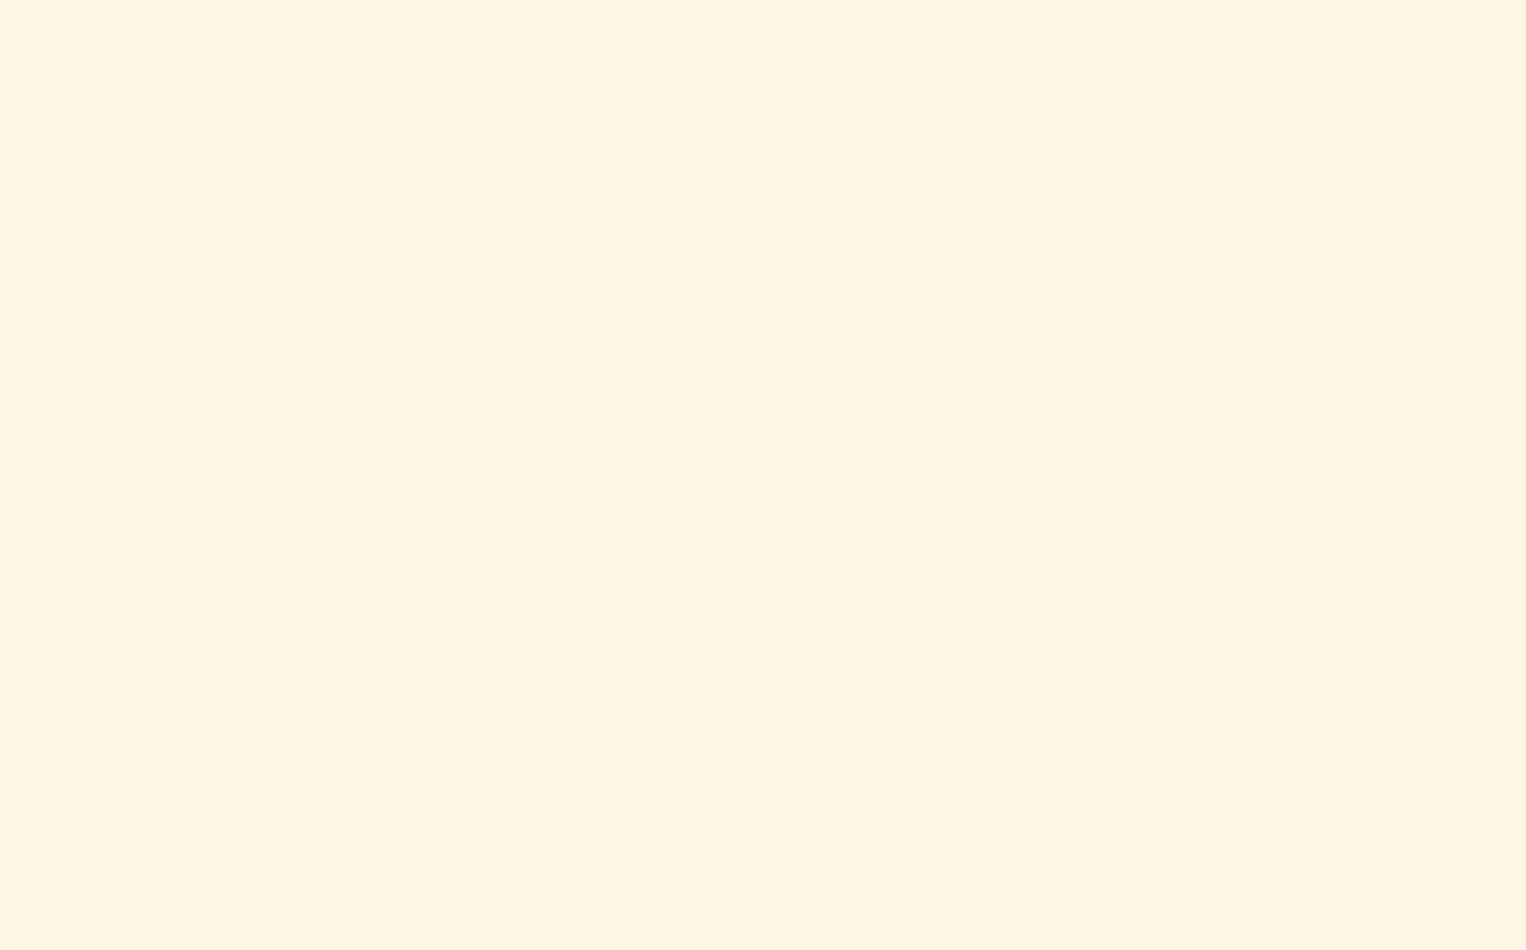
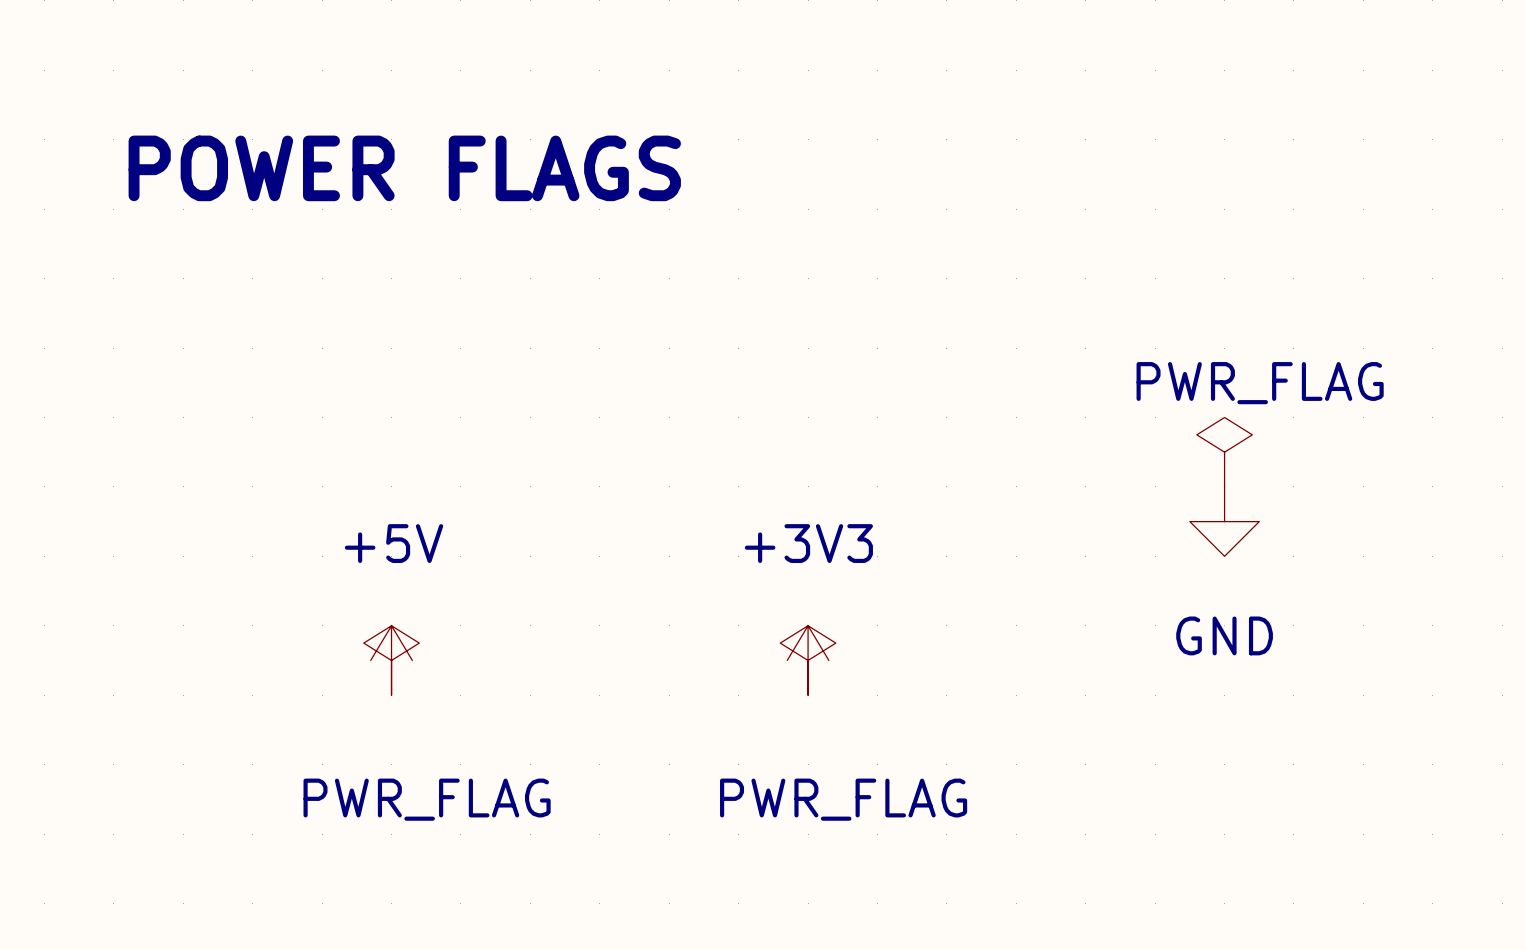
text: none -> POWER FLAGS (404, 168)
power symbol: none -> PWR_FLAG (1224, 452)
power symbol: none -> GND (1224, 521)
power symbol: none -> +5V (391, 660)
power symbol: none -> PWR_FLAG (391, 660)
power symbol: none -> +3V3 (808, 660)
power symbol: none -> PWR_FLAG (808, 660)

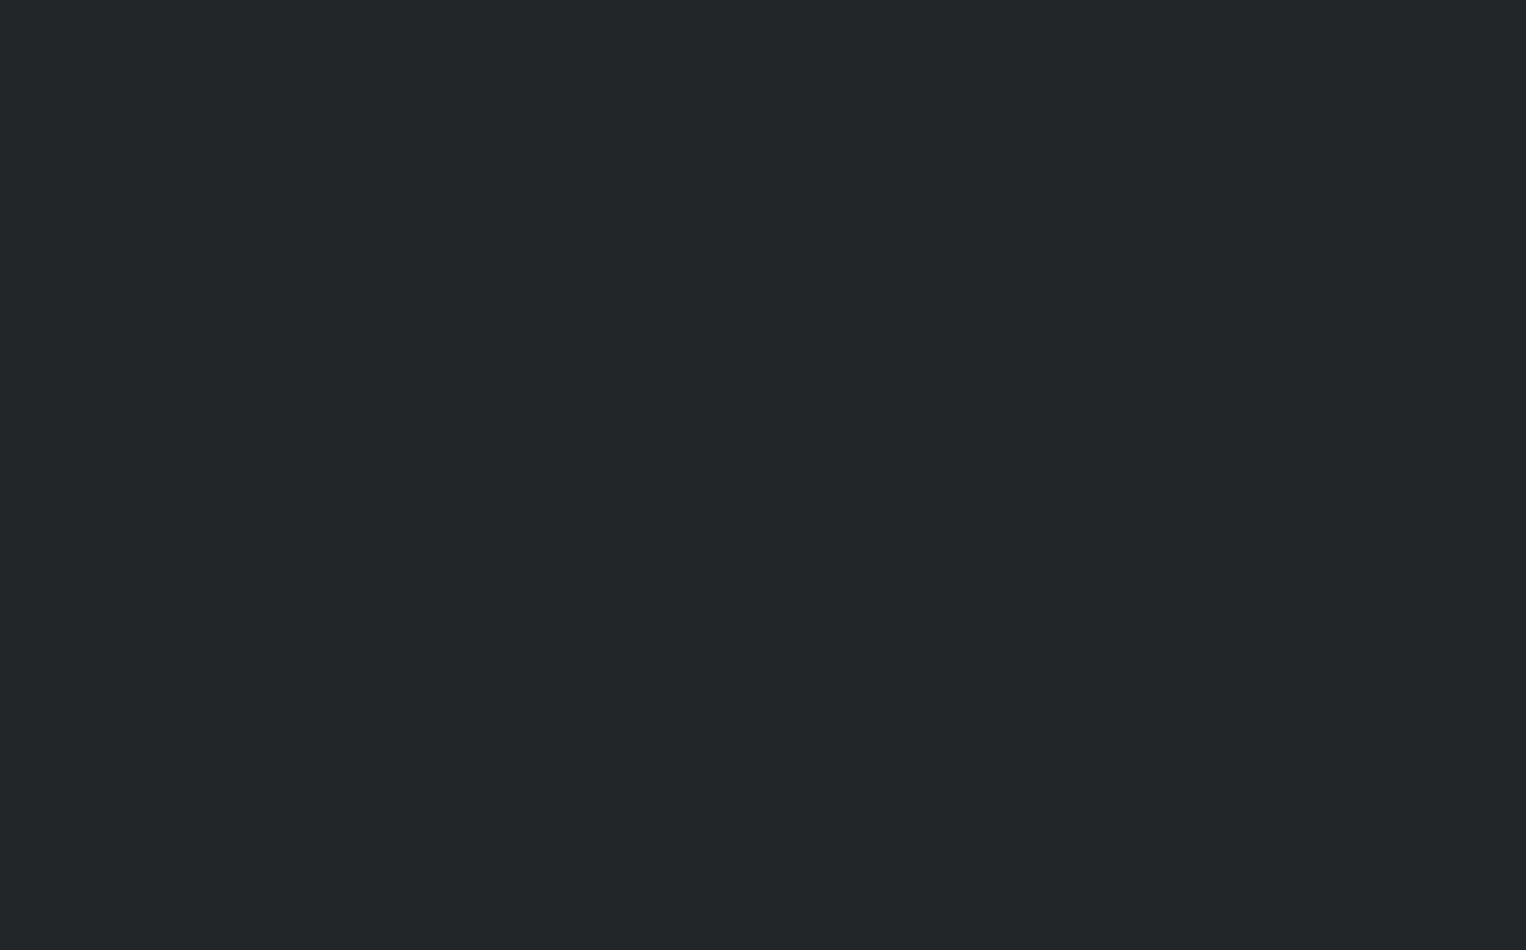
text: POWER FLAGS (404, 168) -> none
power symbol: PWR_FLAG (1224, 452) -> none
power symbol: GND (1224, 521) -> none
power symbol: +5V (391, 660) -> none
power symbol: PWR_FLAG (391, 660) -> none
power symbol: +3V3 (808, 660) -> none
power symbol: PWR_FLAG (808, 660) -> none

